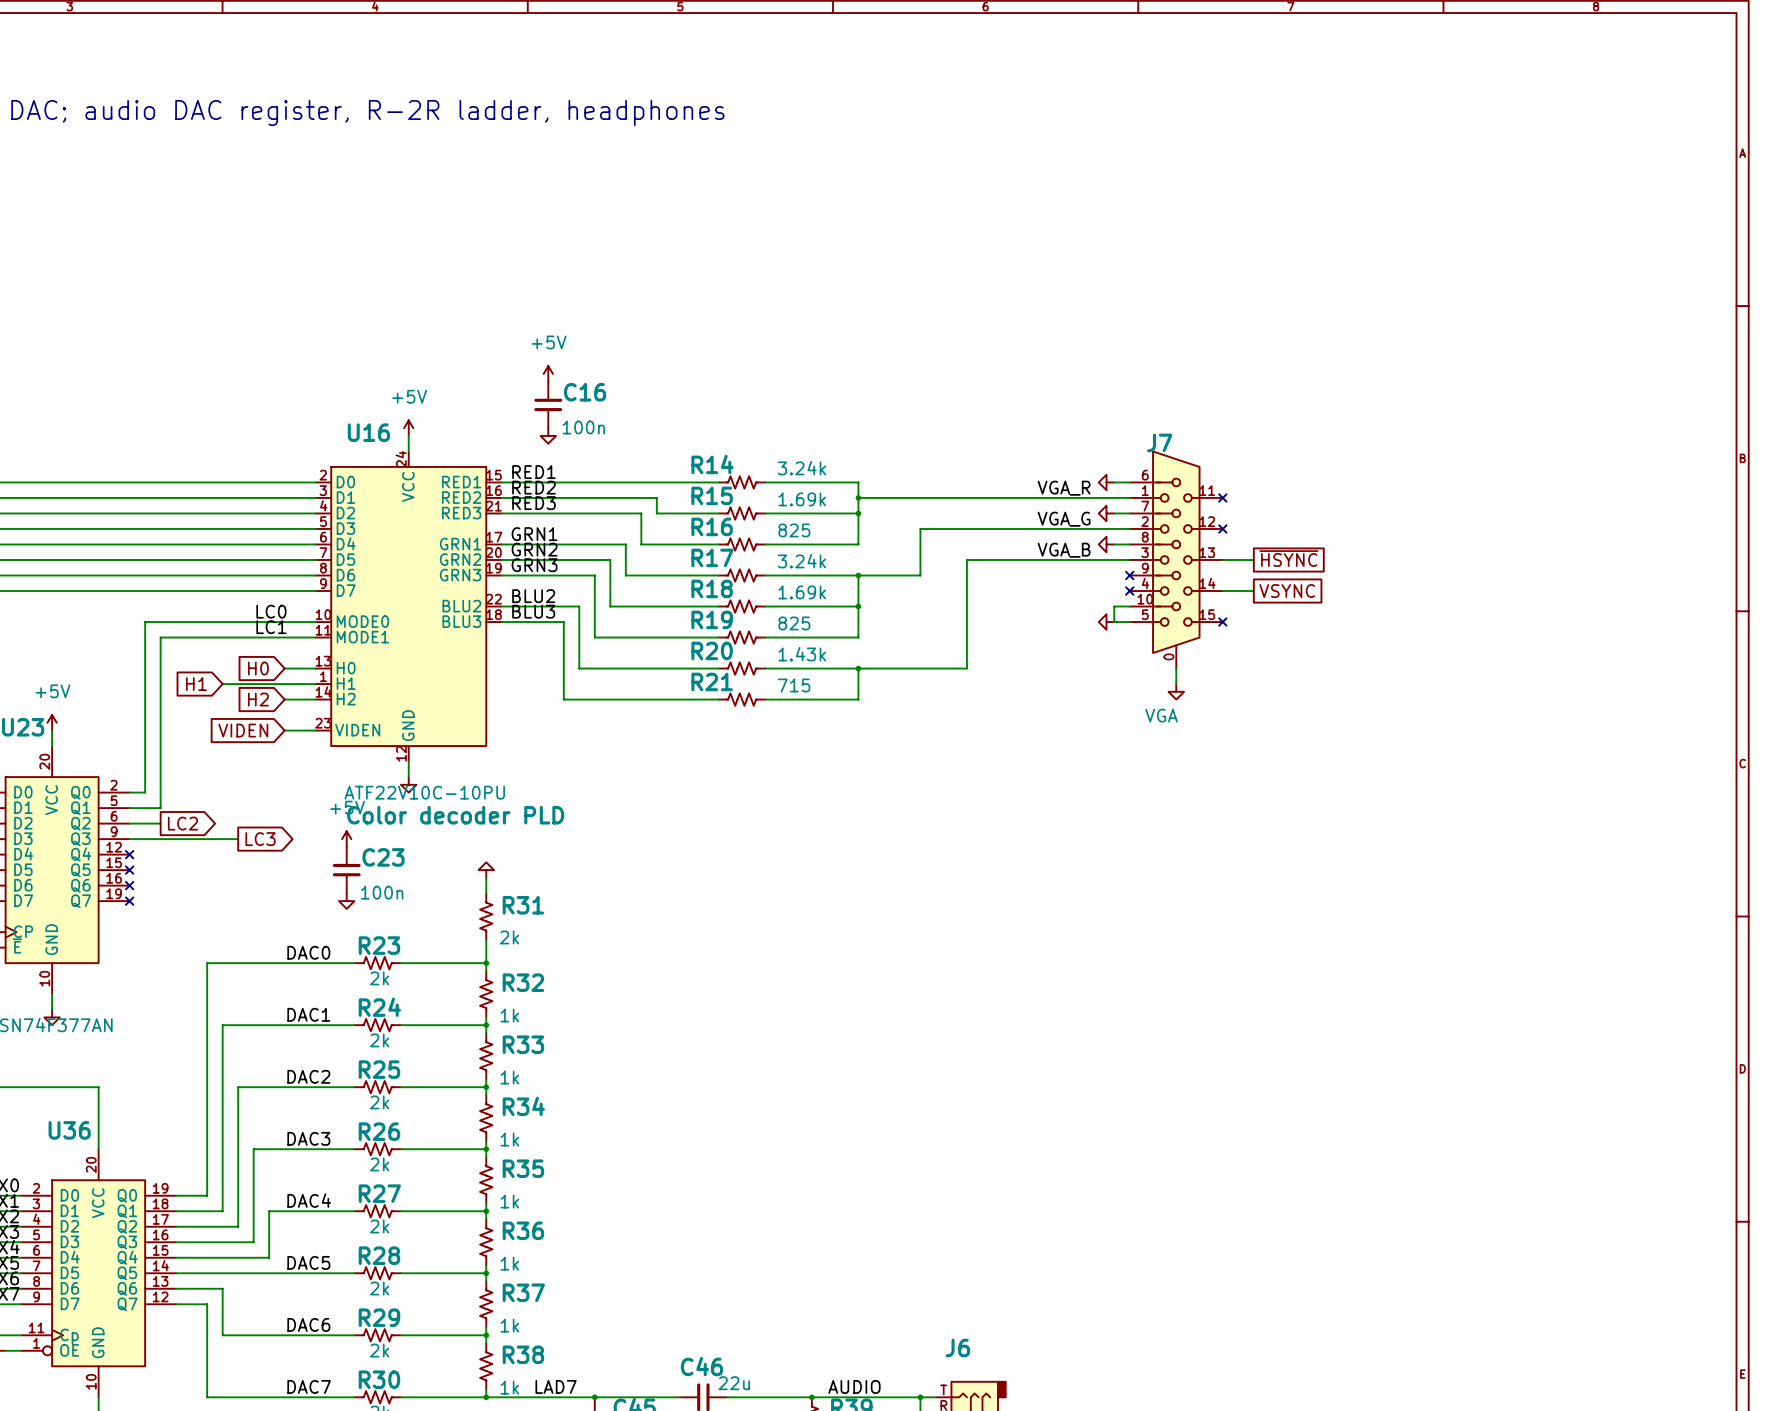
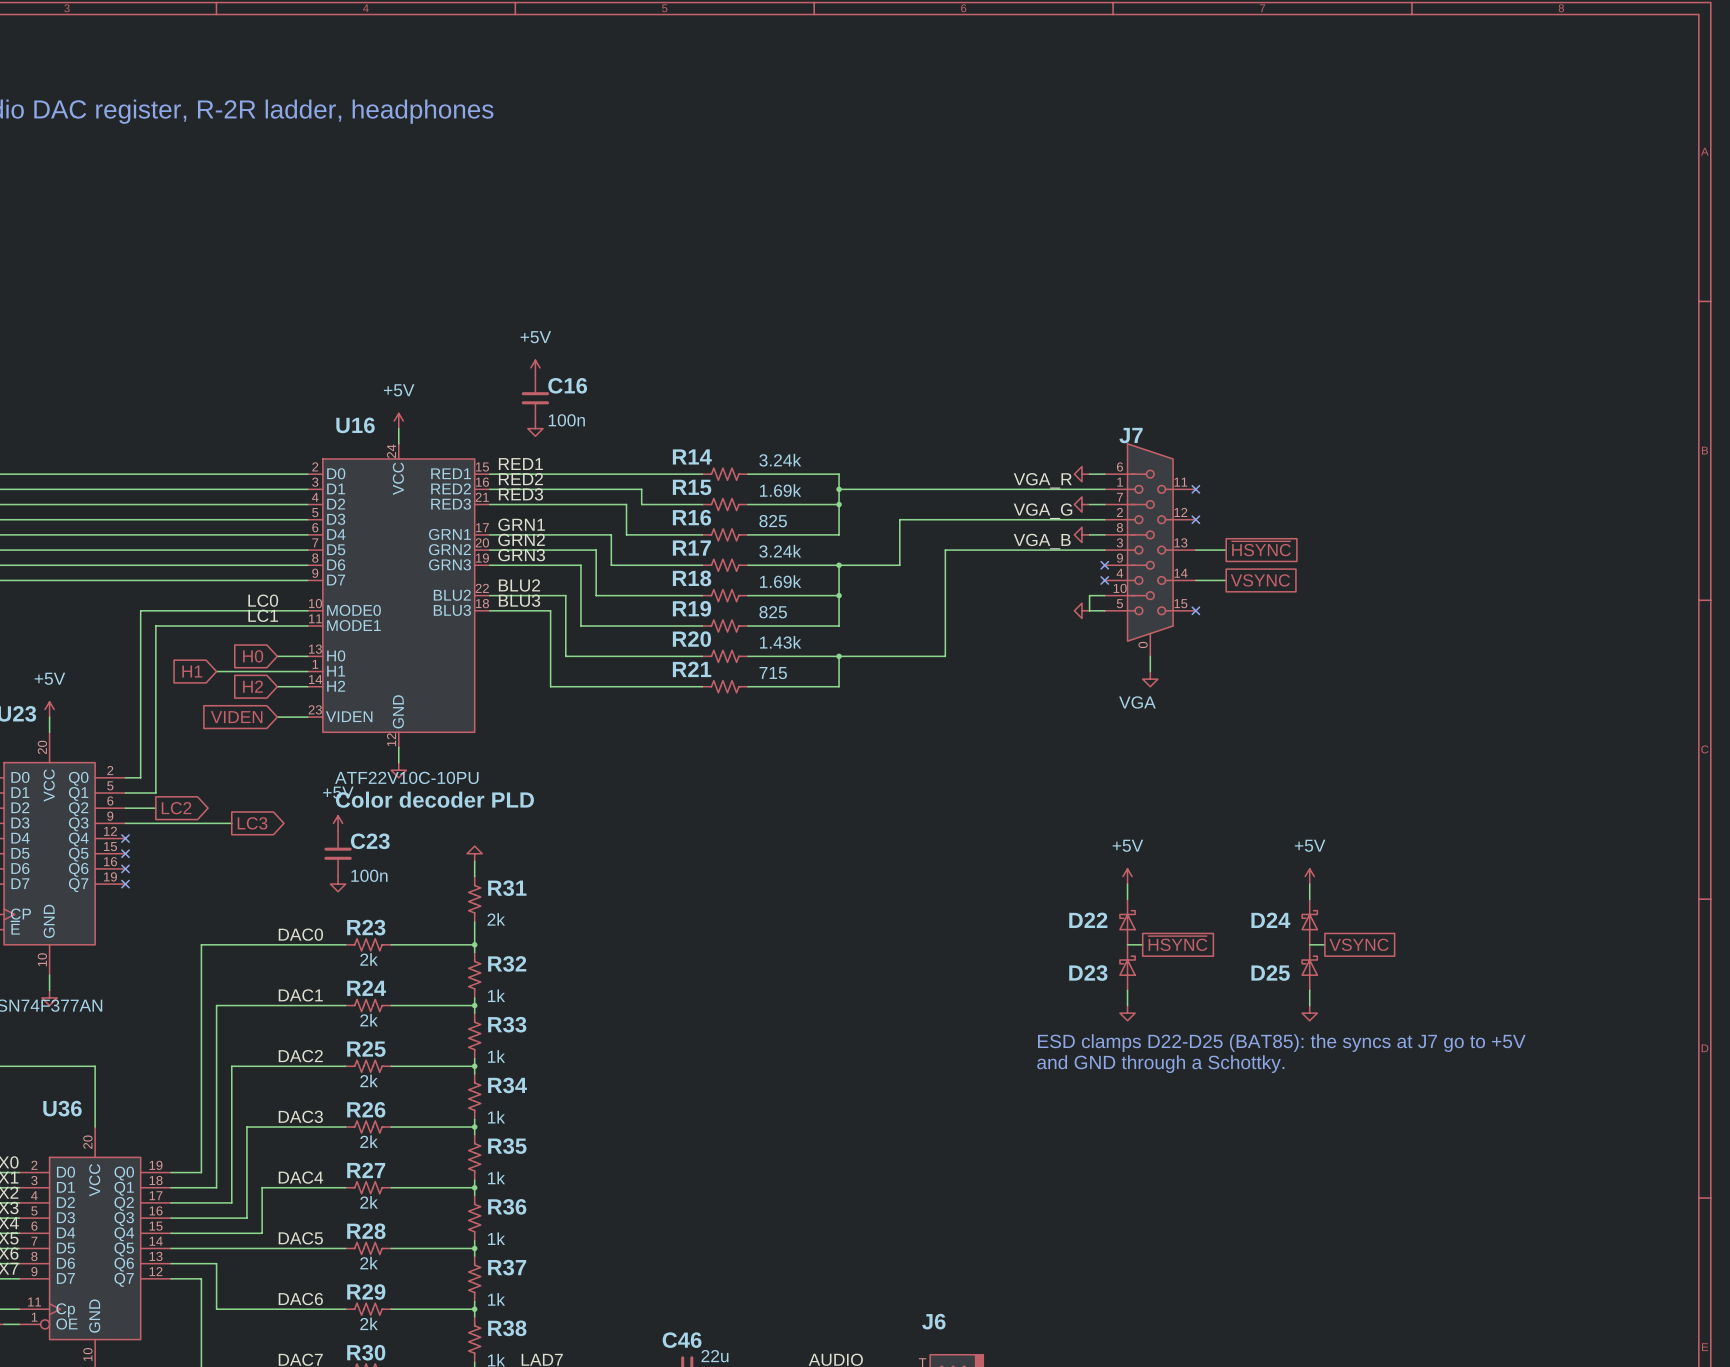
power symbol: none -> +5V (1127, 876)
power symbol: none -> +5V (1309, 876)
wire: none -> (1127, 884) (1127, 899)
wire: none -> (1309, 884) (1309, 899)
D22: none -> (1127, 922)
D24: none -> (1309, 922)
global label: none -> ~{HSYNC} (1177, 943)
wire: none -> (1127, 944) (1142, 944)
wire: none -> (1309, 944) (1324, 944)
global label: none -> VSYNC (1359, 944)
D23: none -> (1127, 967)
D25: none -> (1309, 967)
wire: none -> (1127, 990) (1127, 1005)
wire: none -> (1309, 990) (1309, 1005)
power symbol: none -> (1127, 1013)
power symbol: none -> (1309, 1013)
text: none -> ESD clamps D22-D25 (BAT85): the syncs at J7 go to +5V (1281, 1043)
text: none -> and GND through a Schottky. (1160, 1064)

